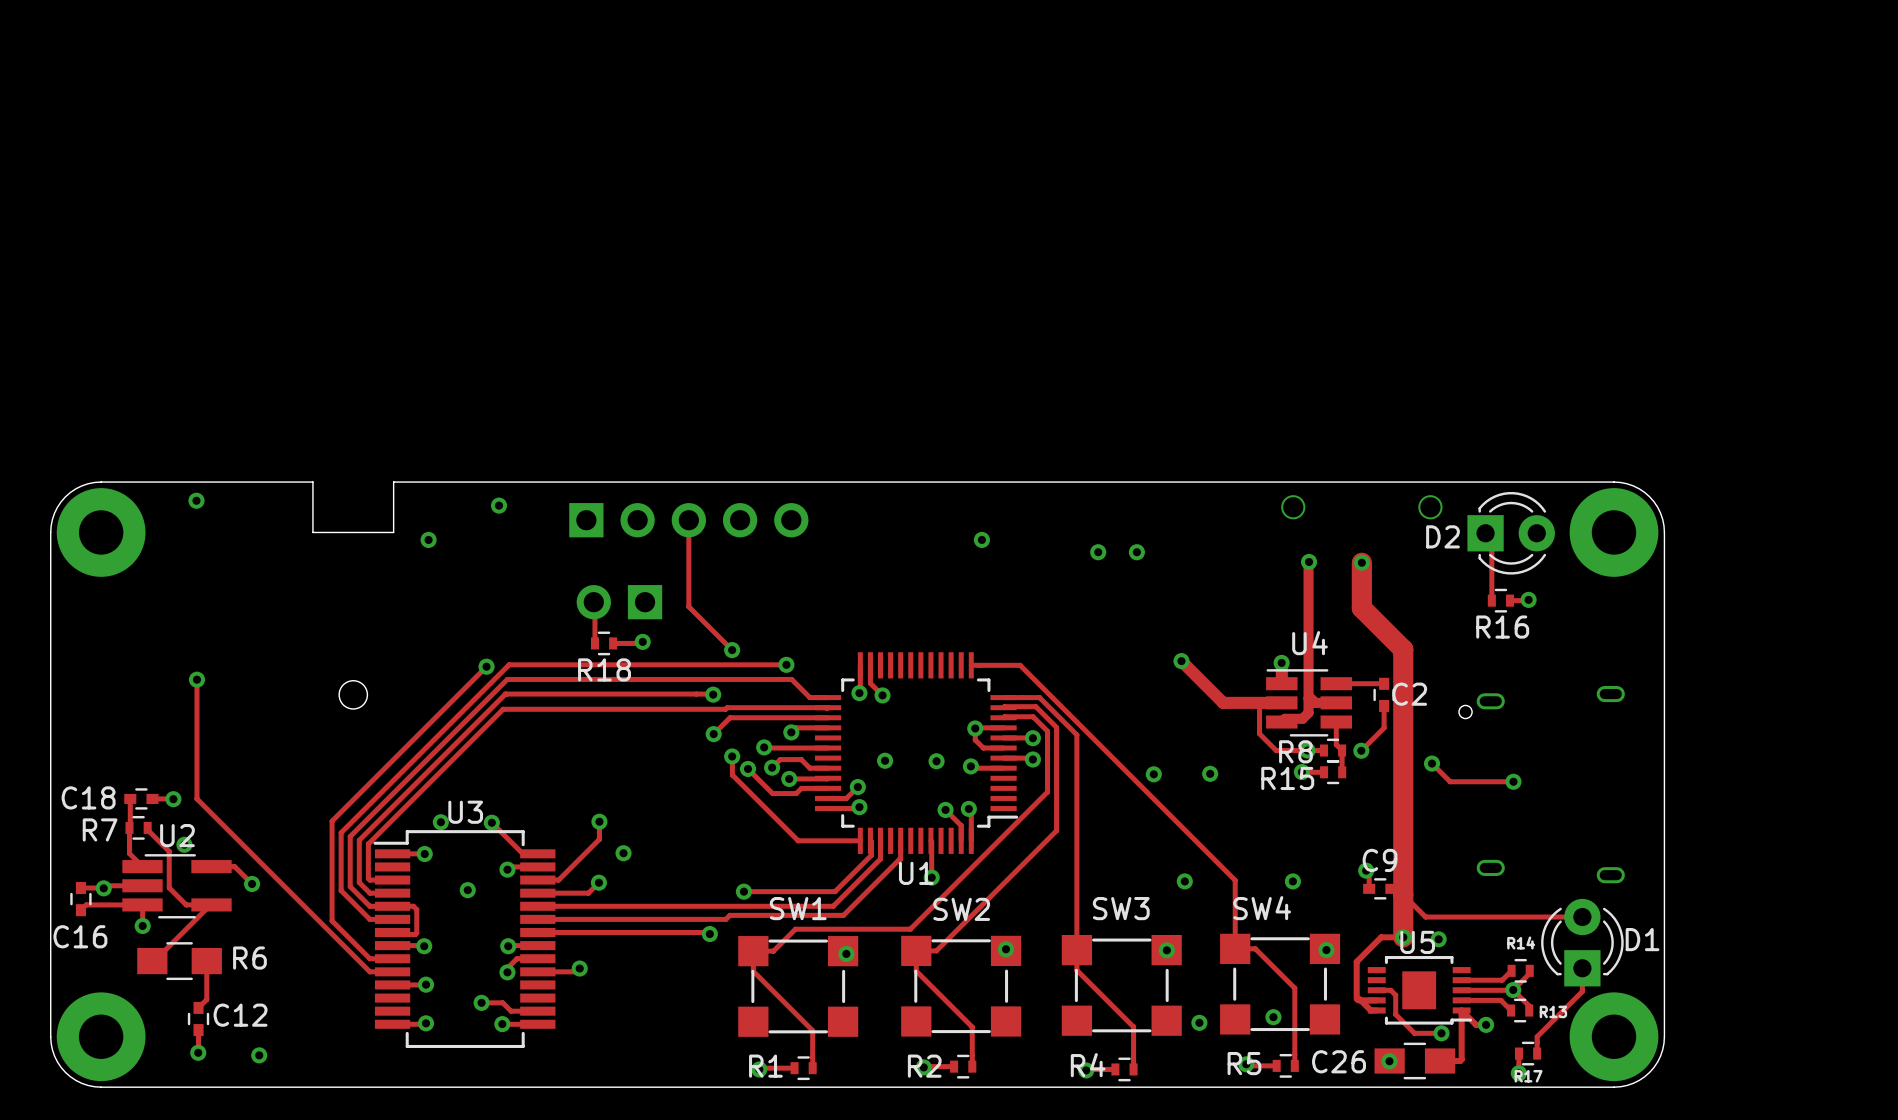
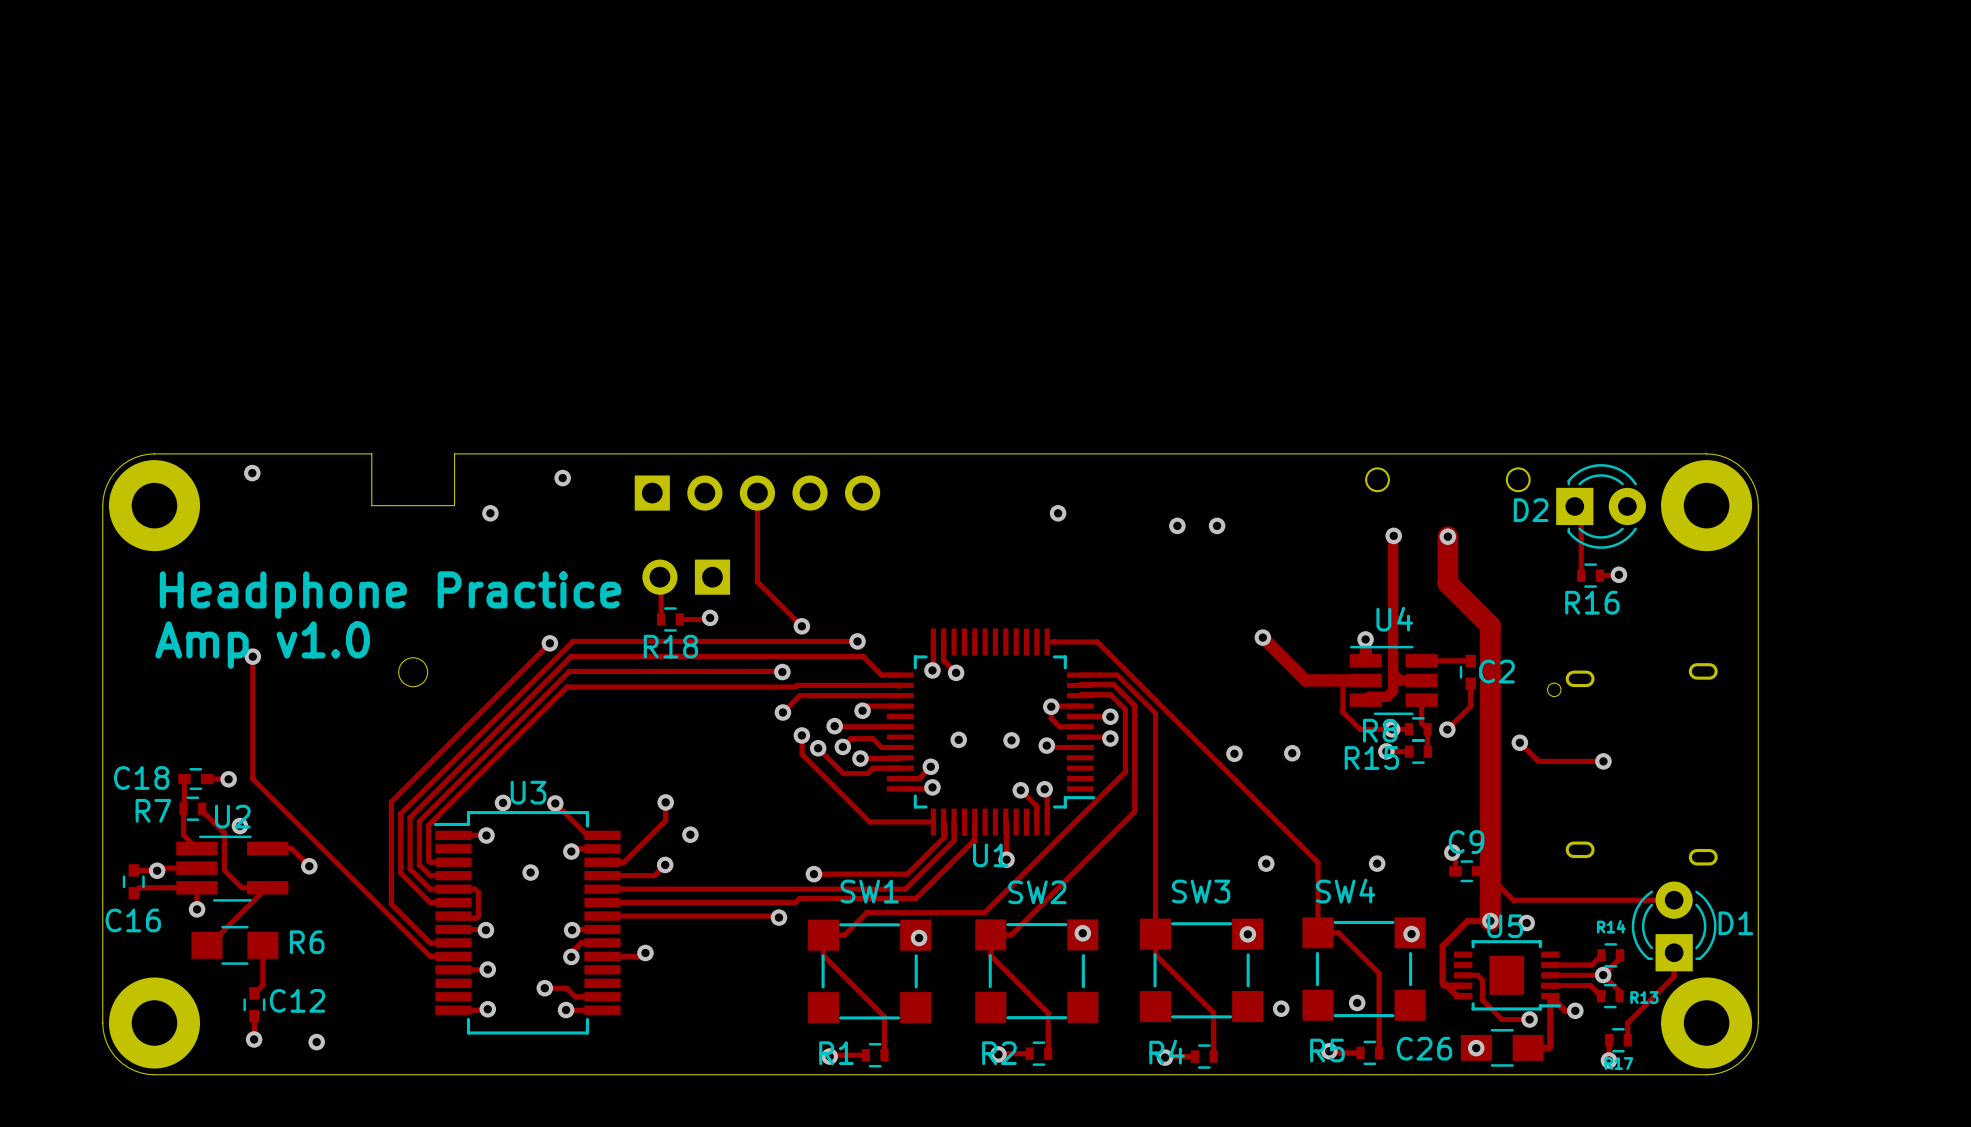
text: none -> Headphone Practice (390, 595)
text: none -> Amp v1.0 (262, 645)

